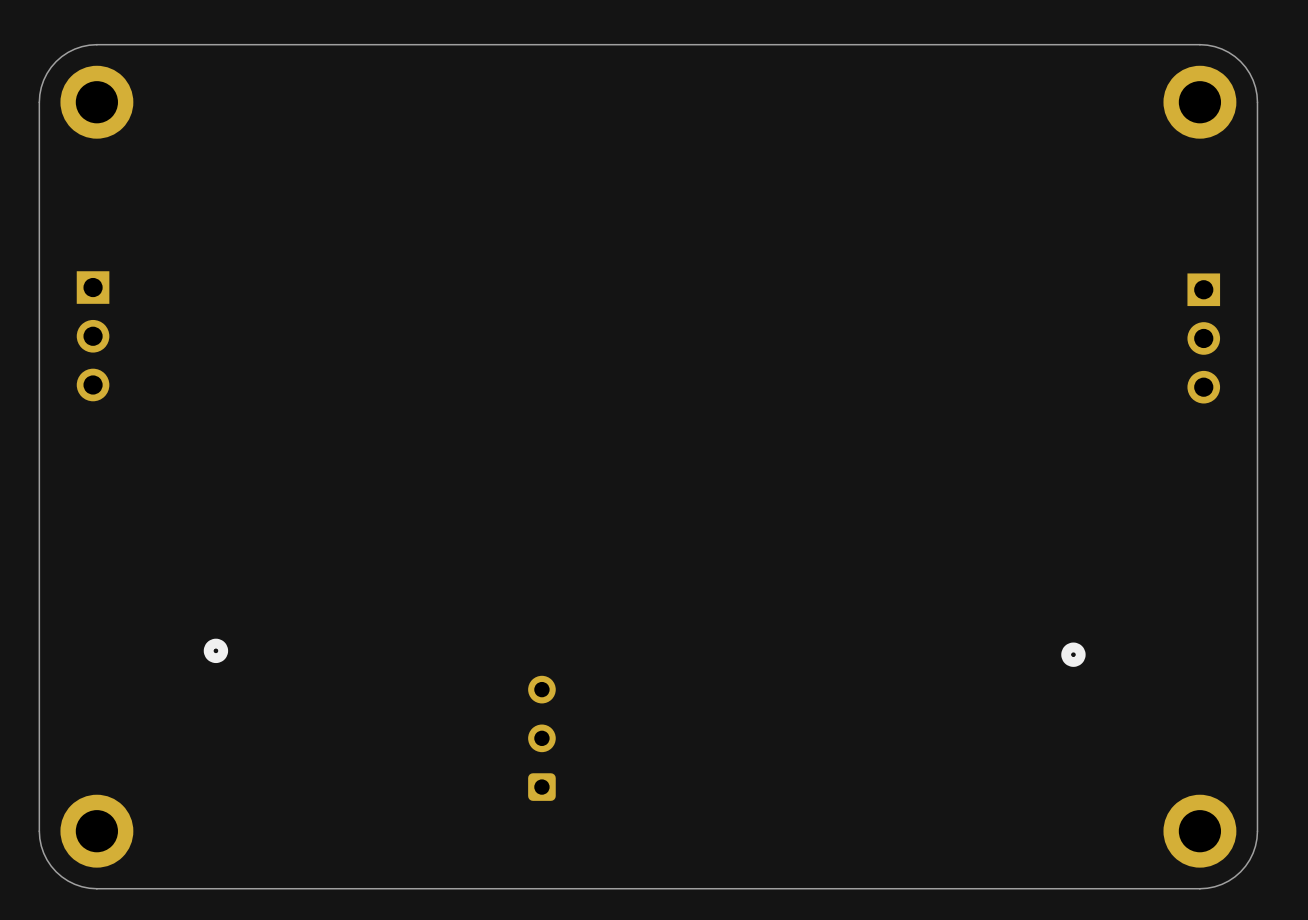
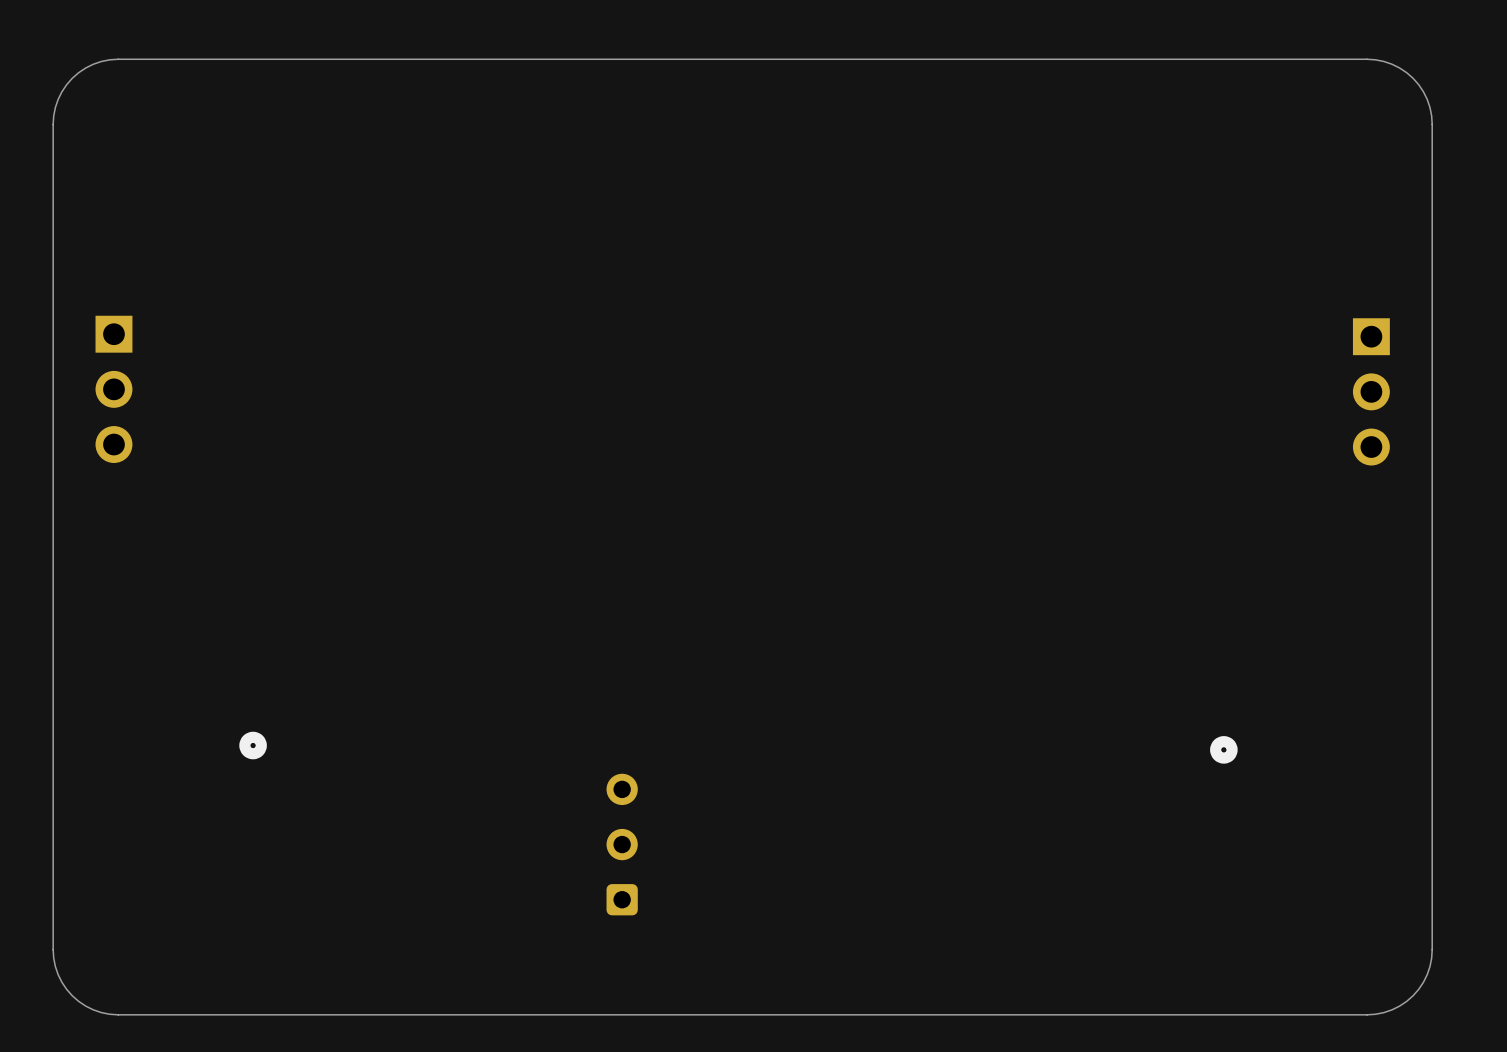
part: (96, 102) -> none
part: (1199, 102) -> none
part: (96, 831) -> none
part: (1199, 831) -> none

